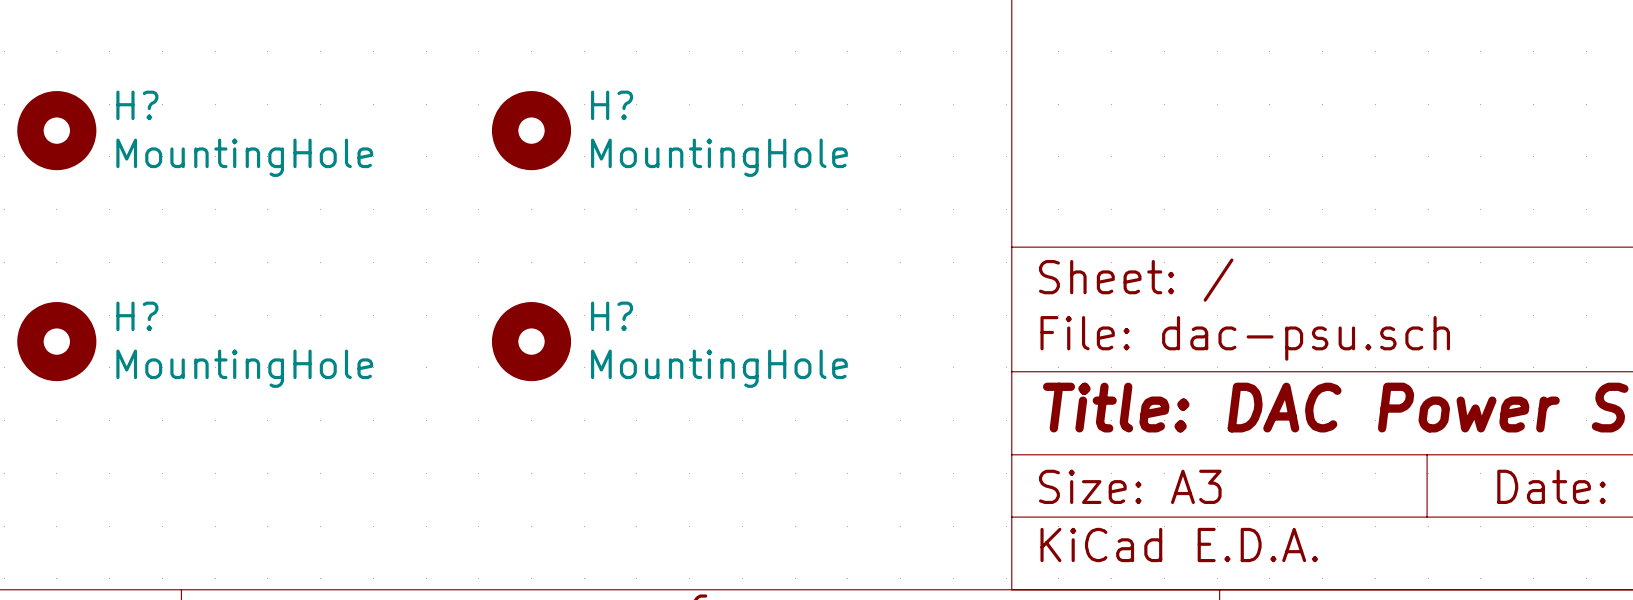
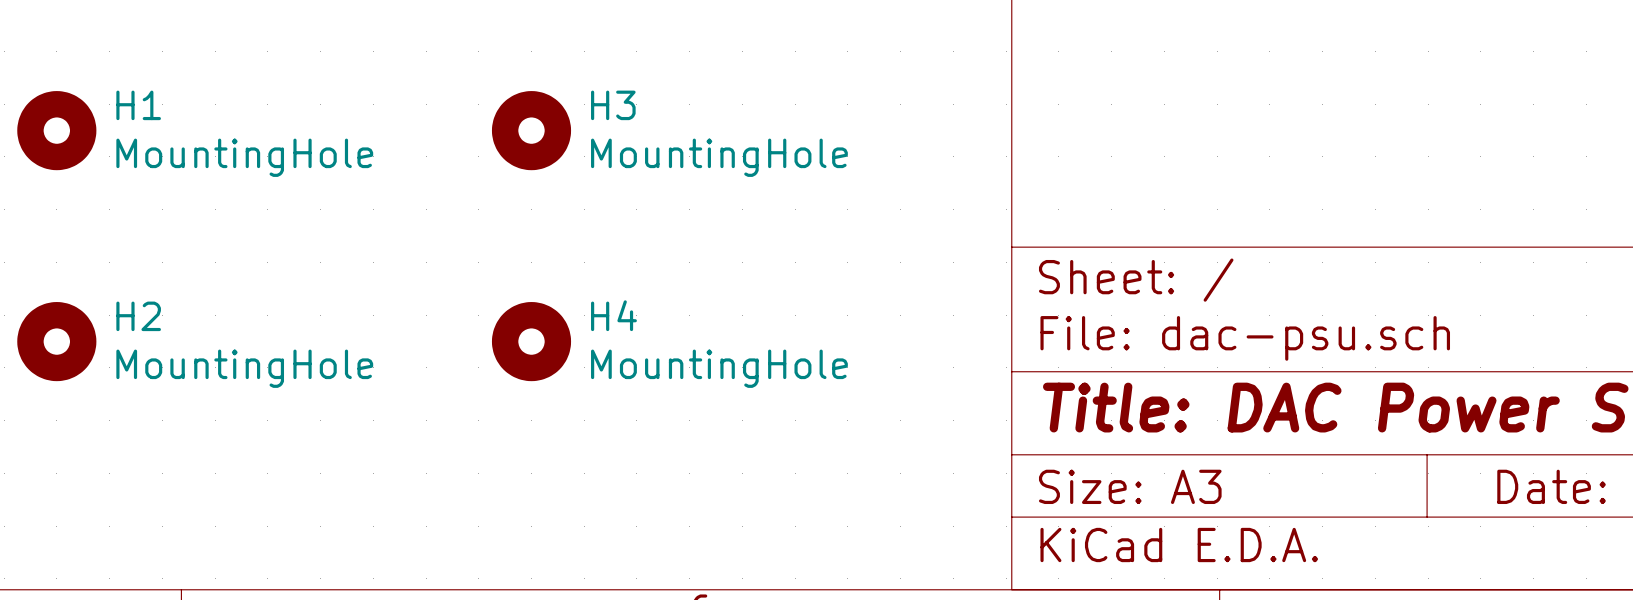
H? name: H? (137, 105) -> H1 (138, 105)
H? name: H? (612, 105) -> H3 (613, 105)
H? name: H? (137, 316) -> H2 (138, 316)
H? name: H? (612, 316) -> H4 (613, 315)

